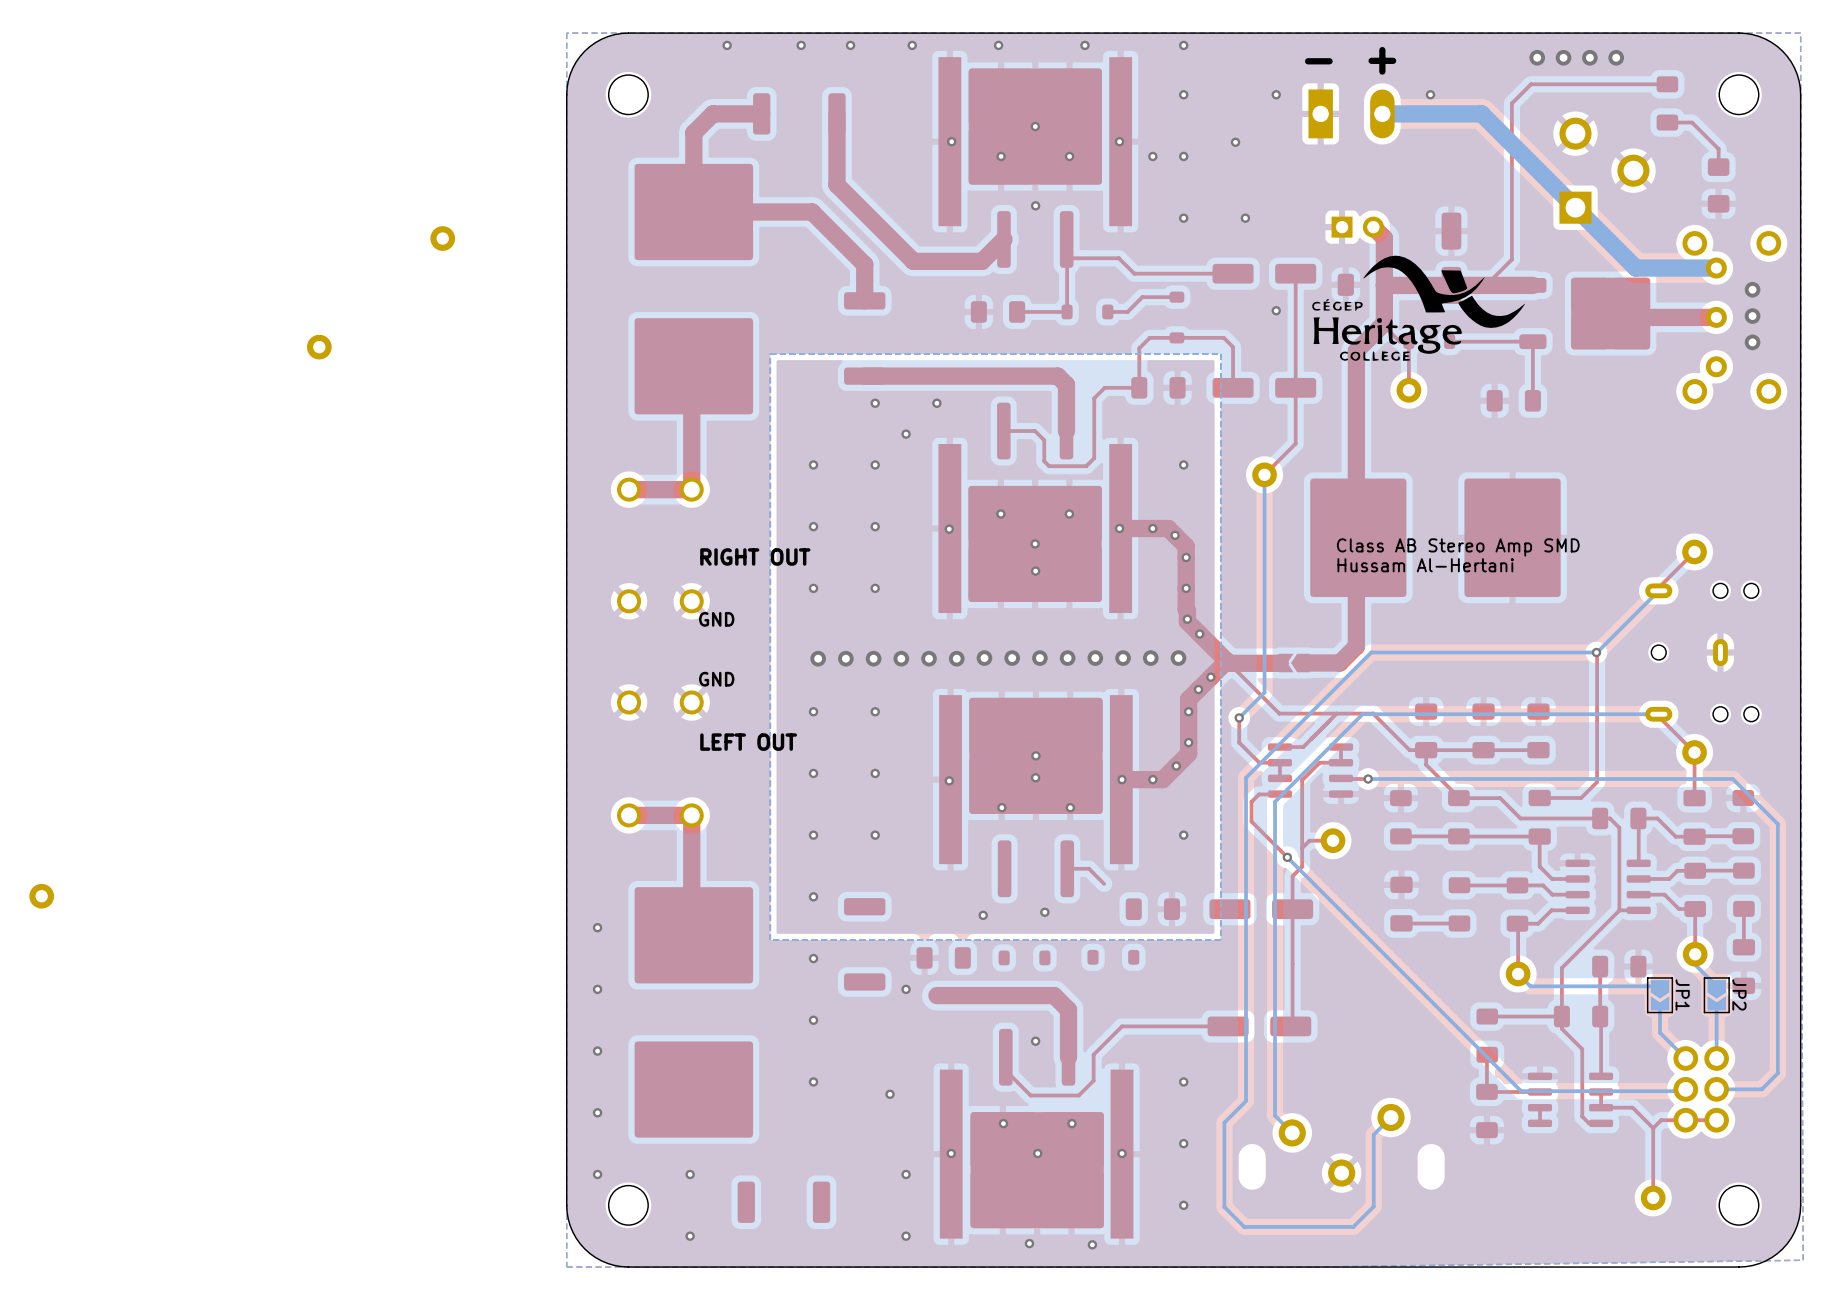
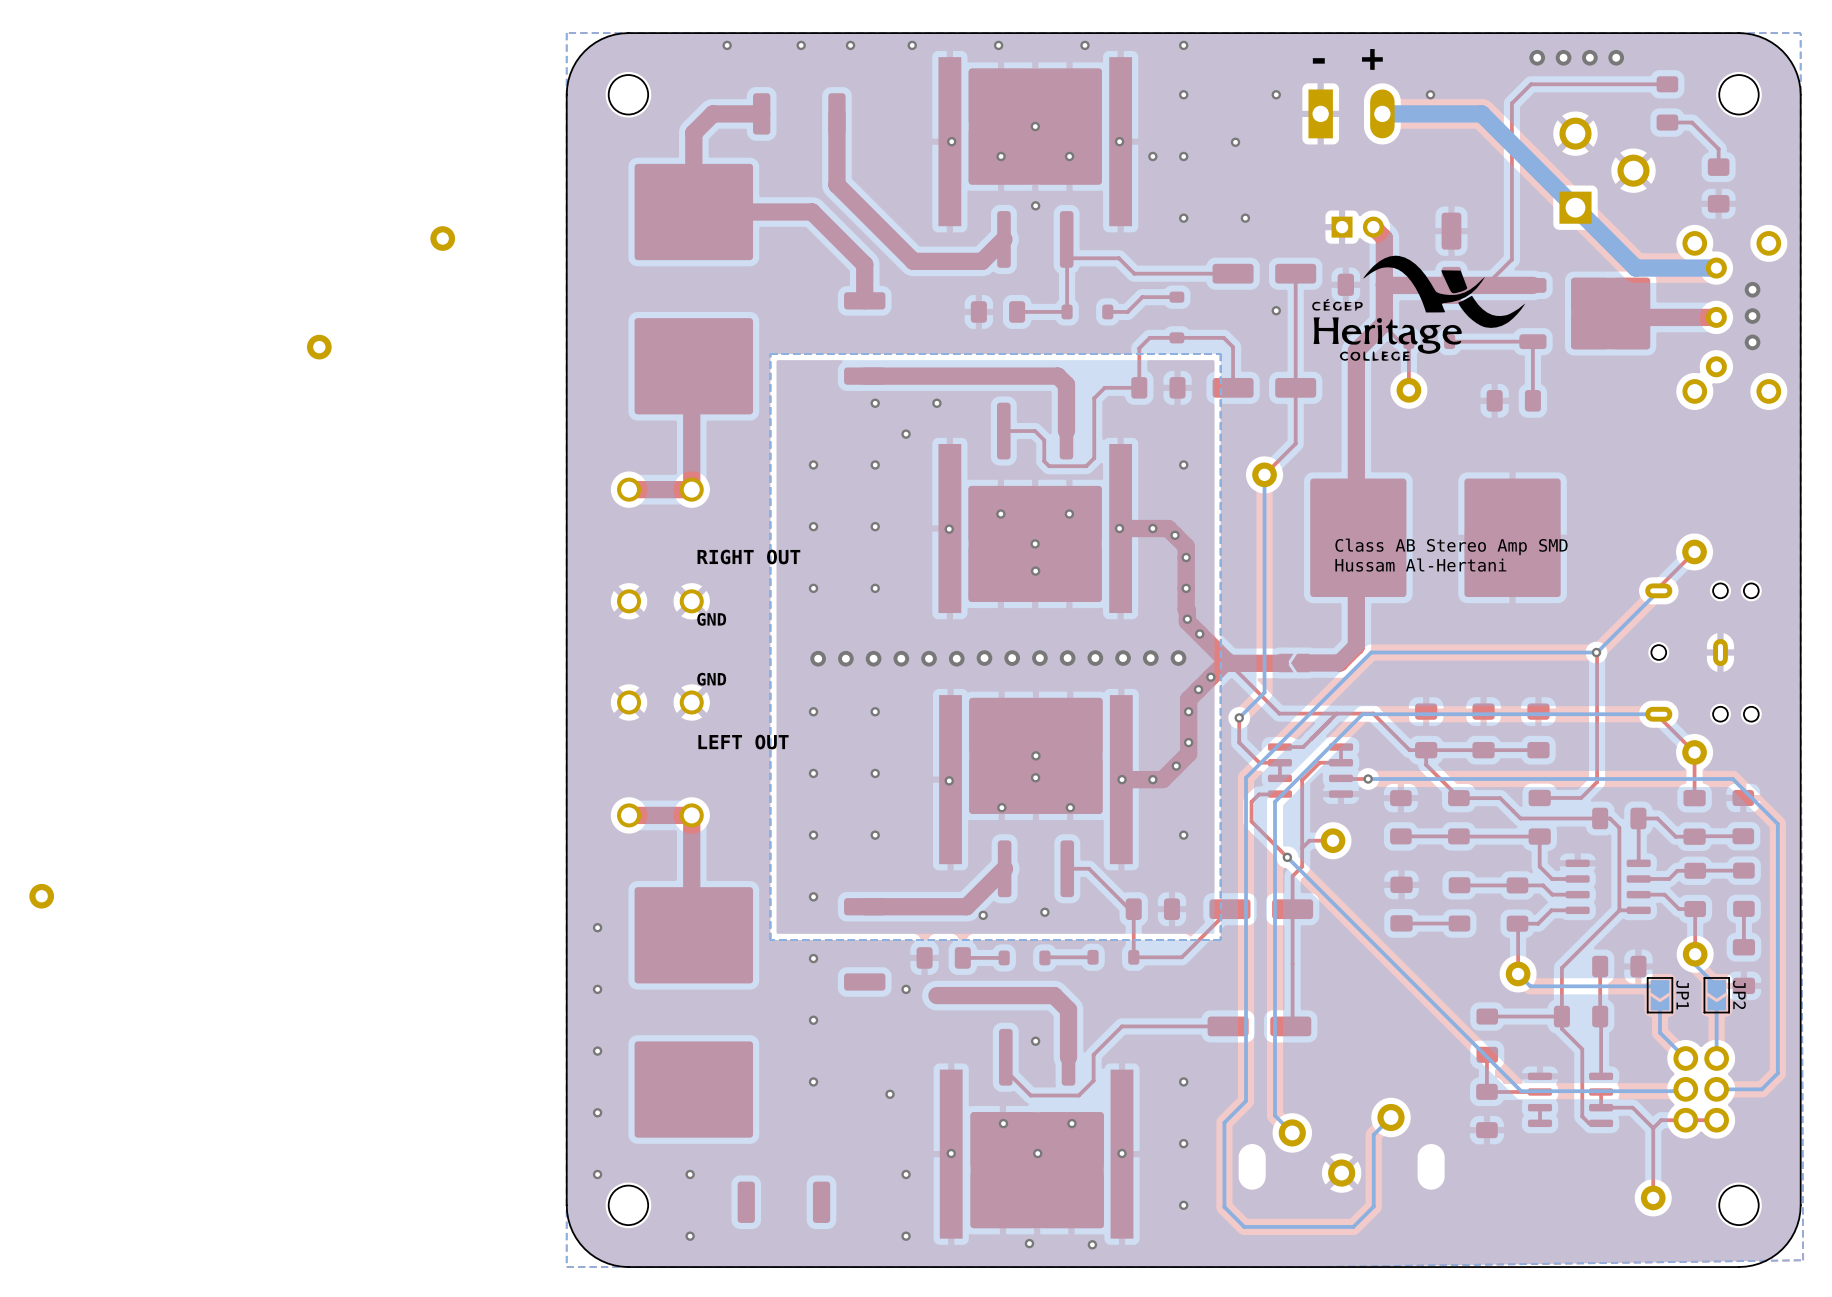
top track: none -> (1004, 868) (966, 906) (864, 906)
top track: none -> (1104, 883) (1129, 909) (1133, 909) (1133, 957) (1181, 957) (1229, 909)
top track: none -> (1004, 957) (962, 957)
top track: none -> (1093, 957) (1044, 957)

